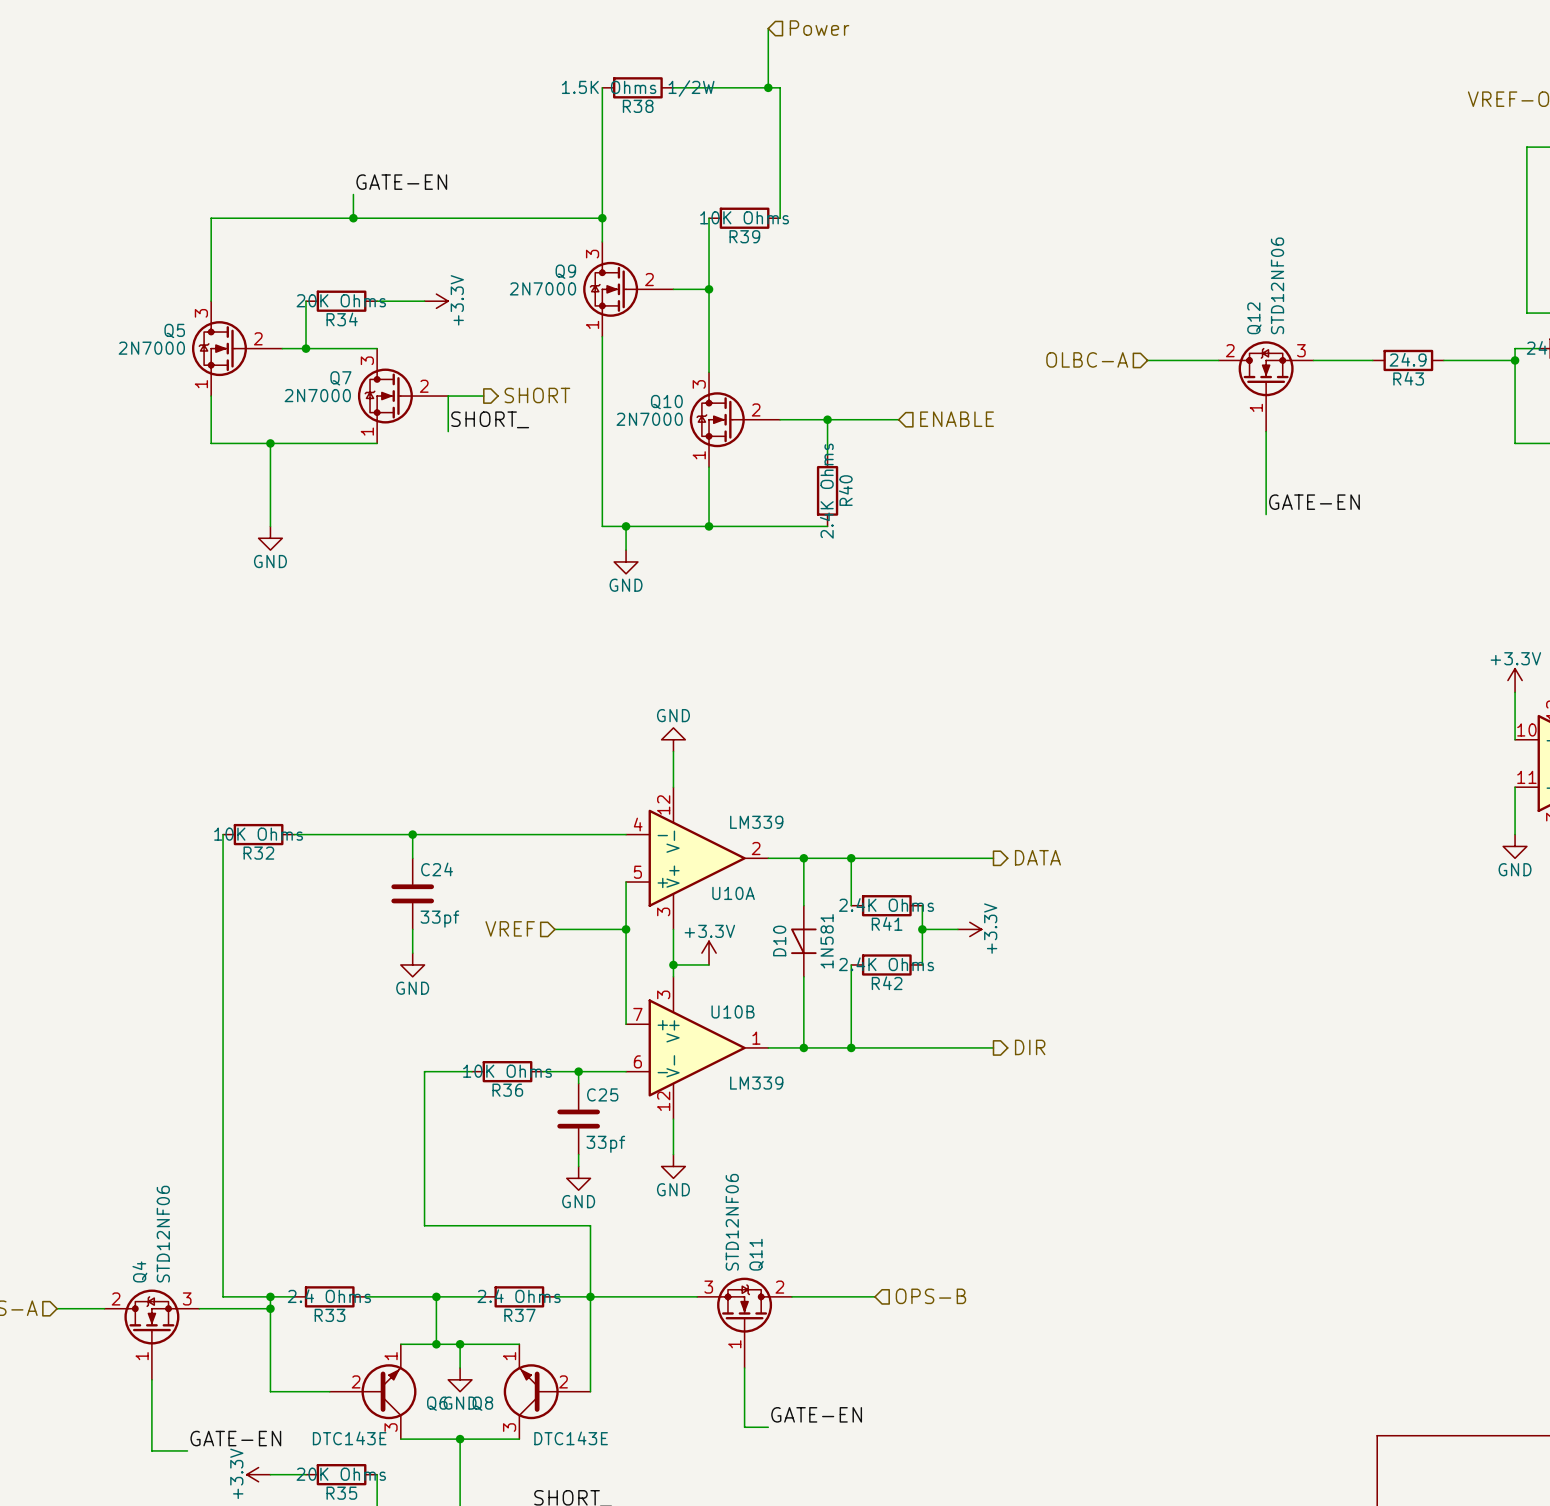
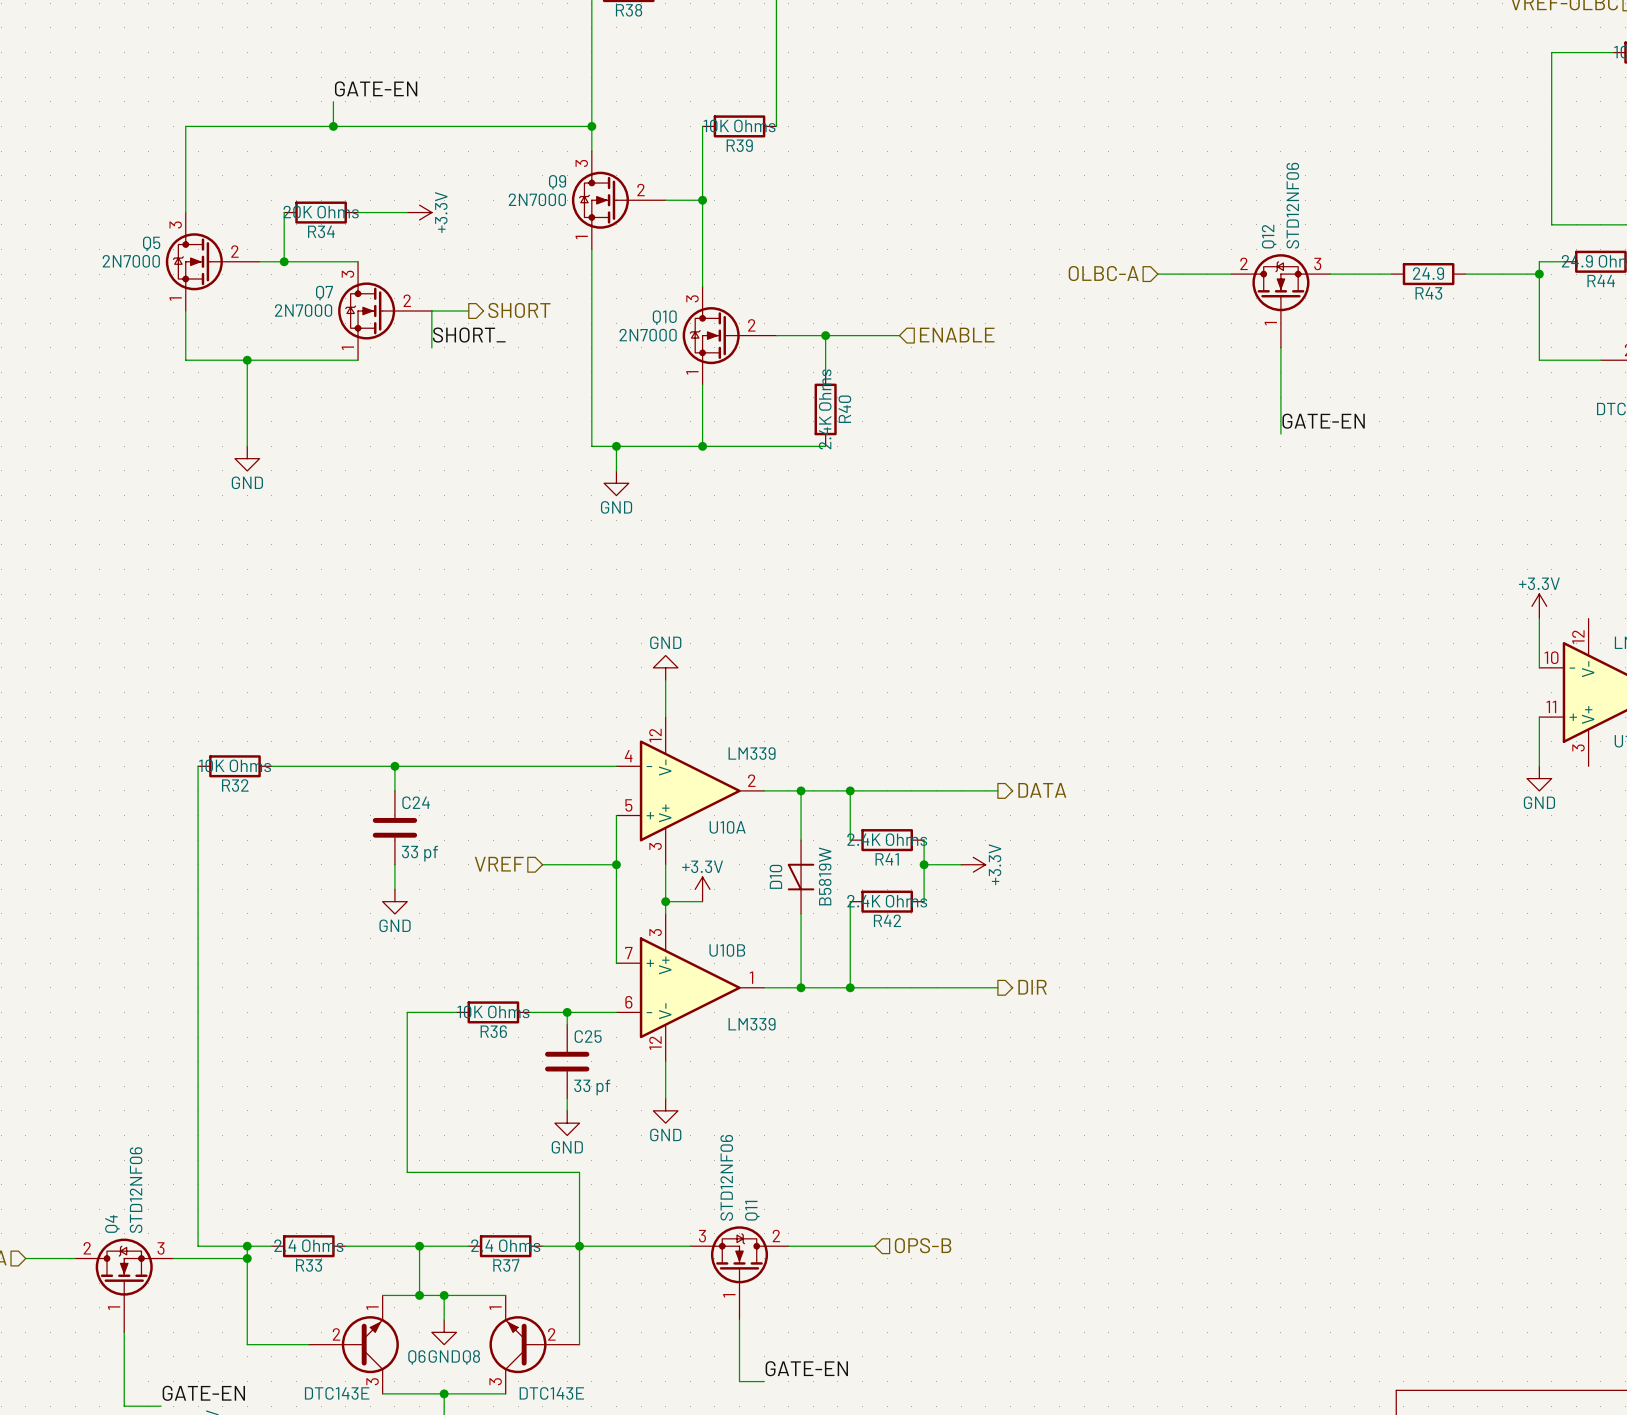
C24 value: 33pf (439, 919) -> 33 pf (419, 853)
D10 value: 1N581 (827, 941) -> B5819W (825, 876)
C25 value: 33pf (605, 1144) -> 33 pf (592, 1087)

